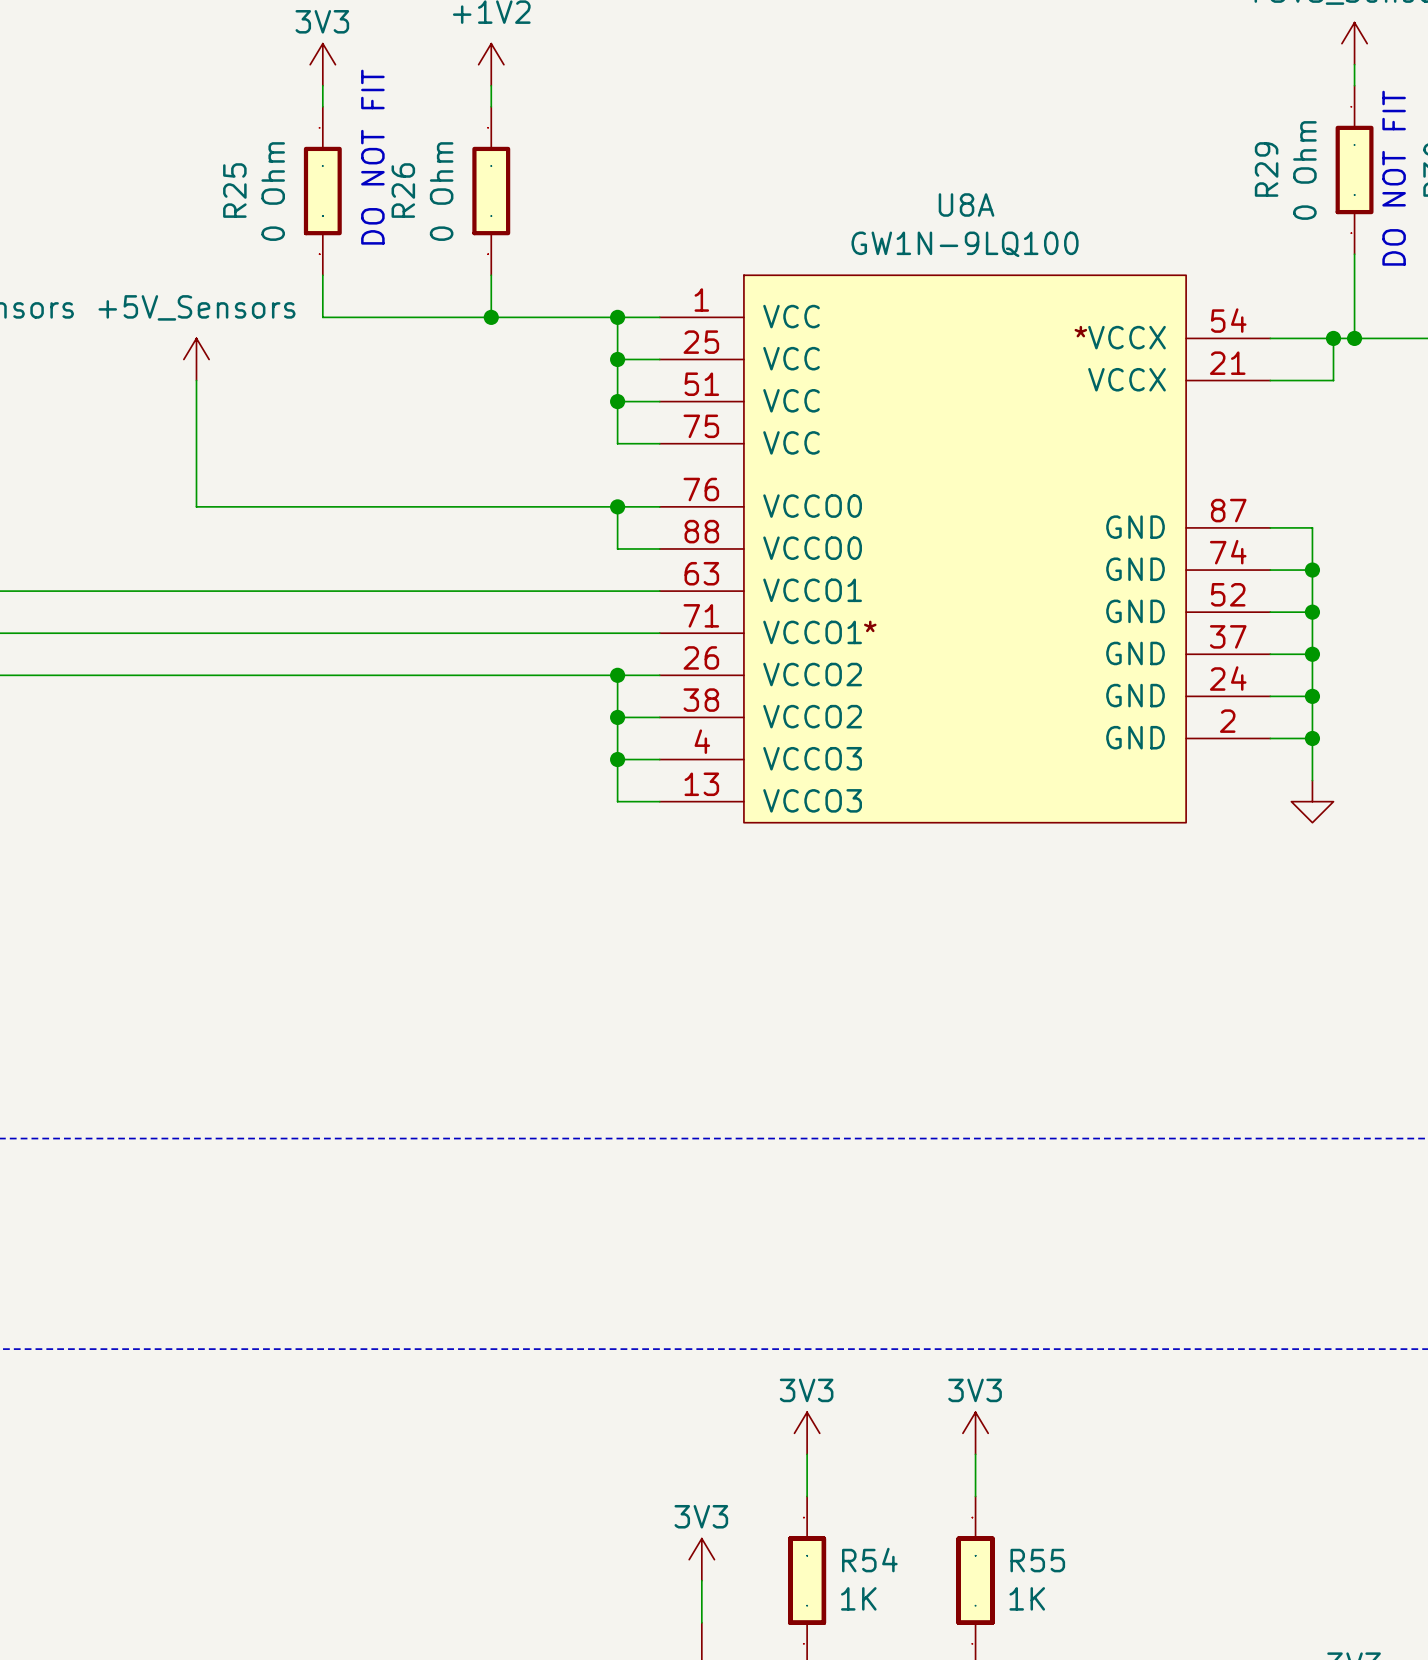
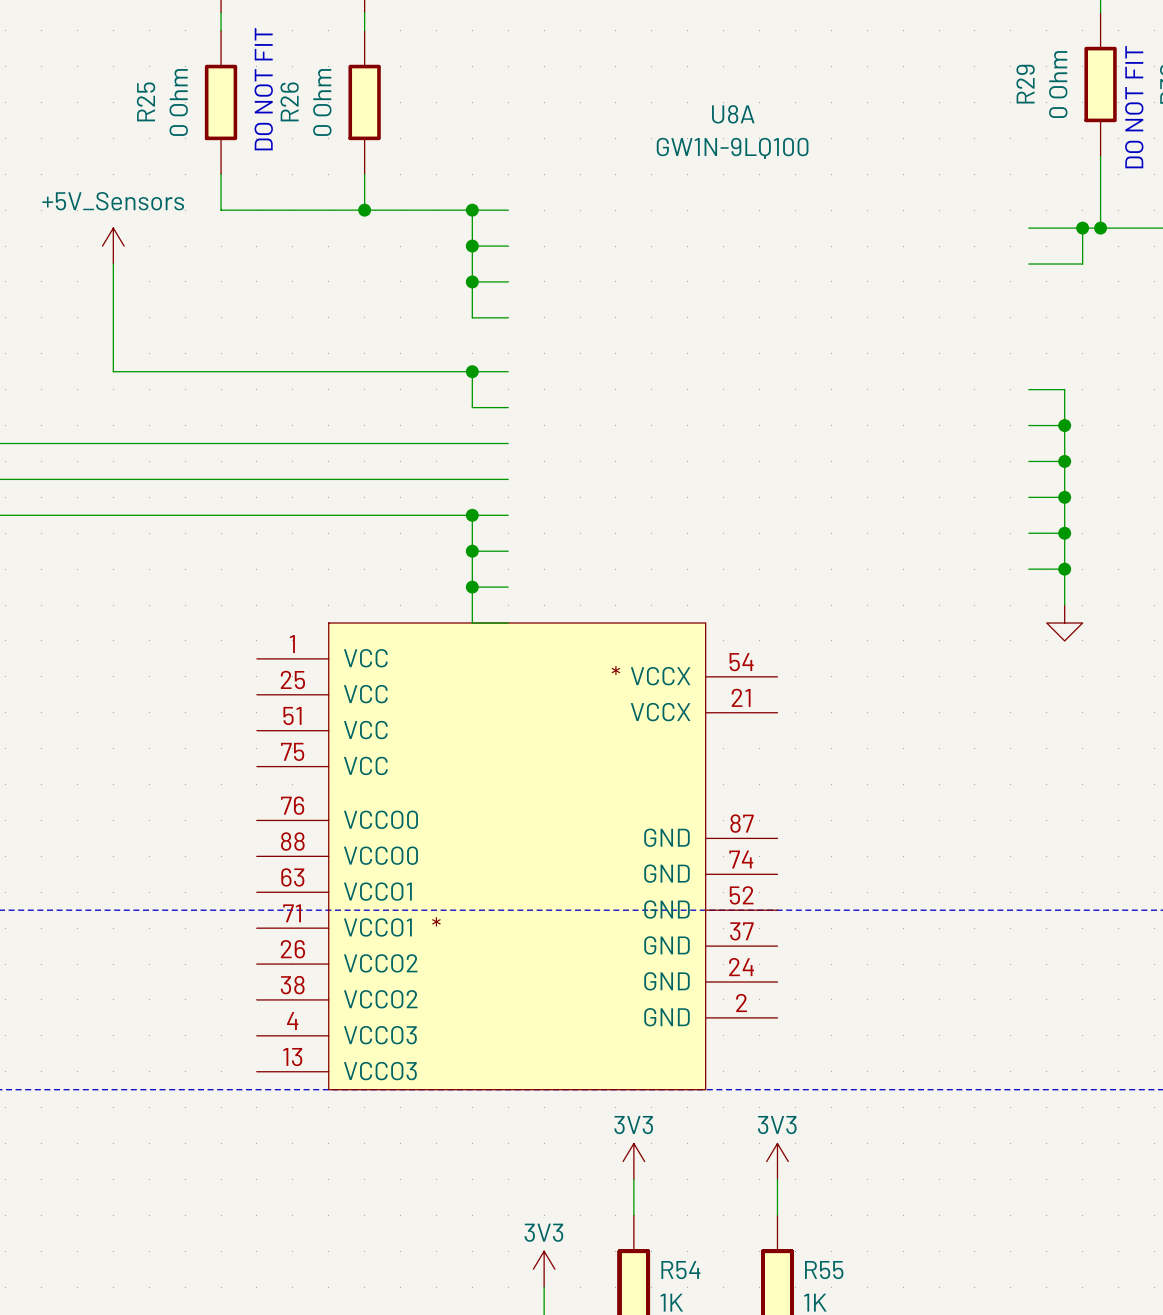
U8A name position: U8A (966, 204) -> U8A (733, 114)
U8A value position: GW1N-9LQ100 (965, 244) -> GW1N-9LQ100 (732, 148)
U8A position: (965, 548) -> (517, 856)

